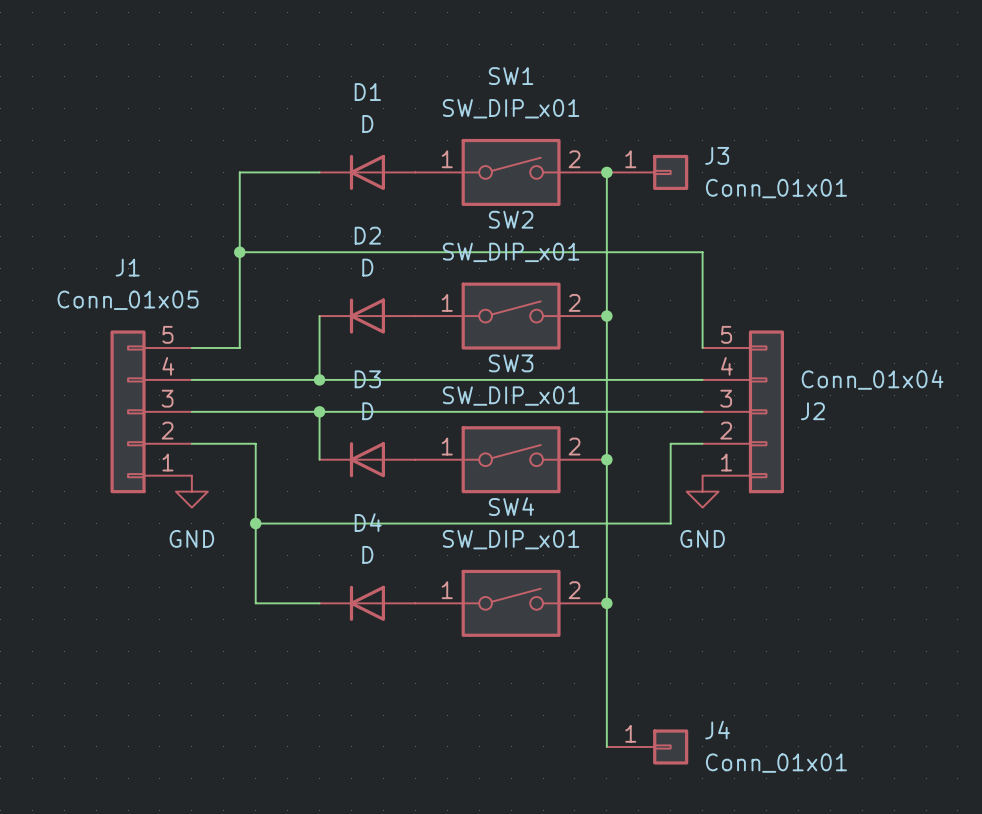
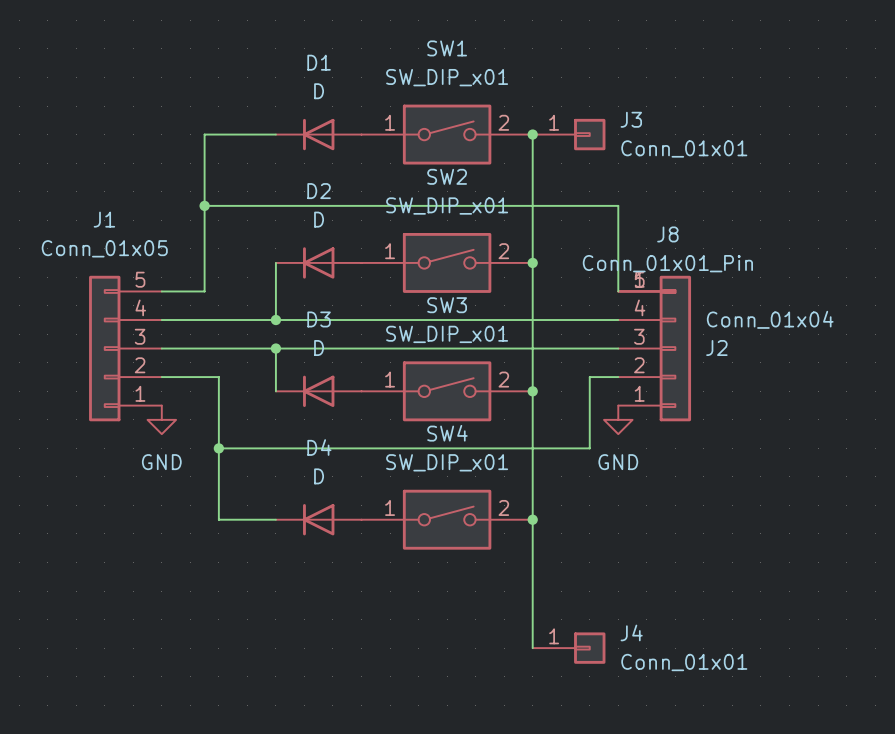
J8: none -> Conn_01x01_Pin (647, 291)

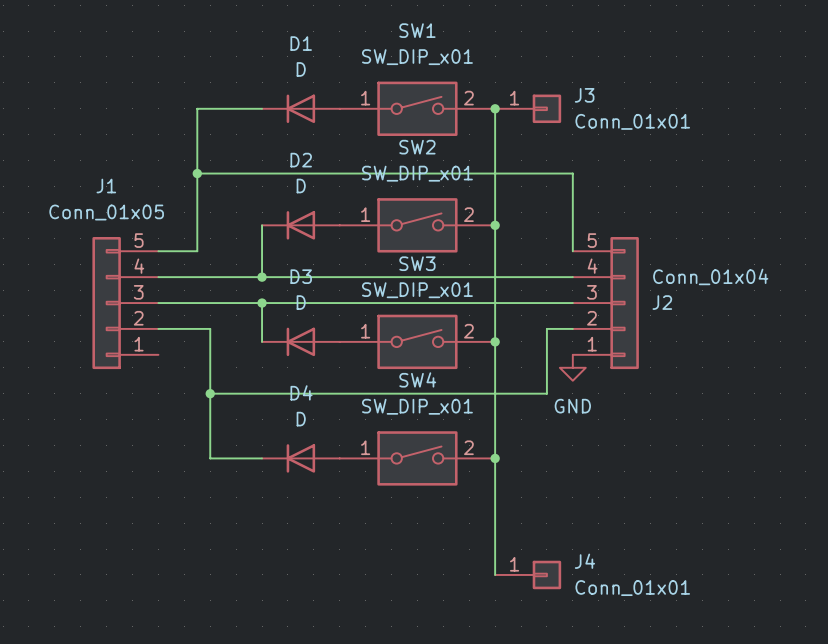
J8: Conn_01x01_Pin (647, 291) -> none
power symbol: GND (161, 419) -> none

